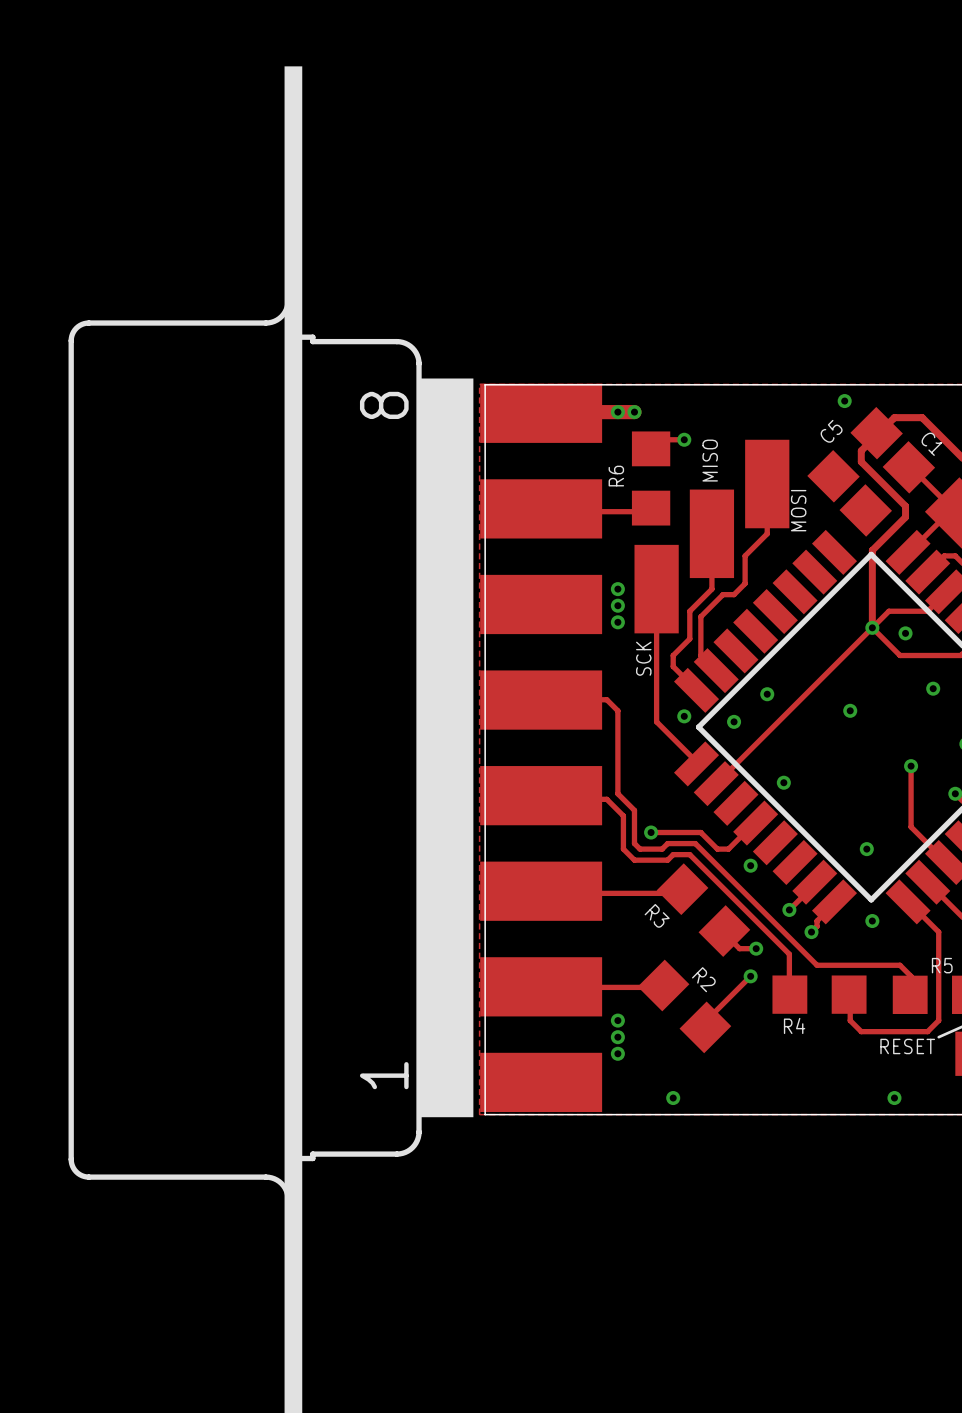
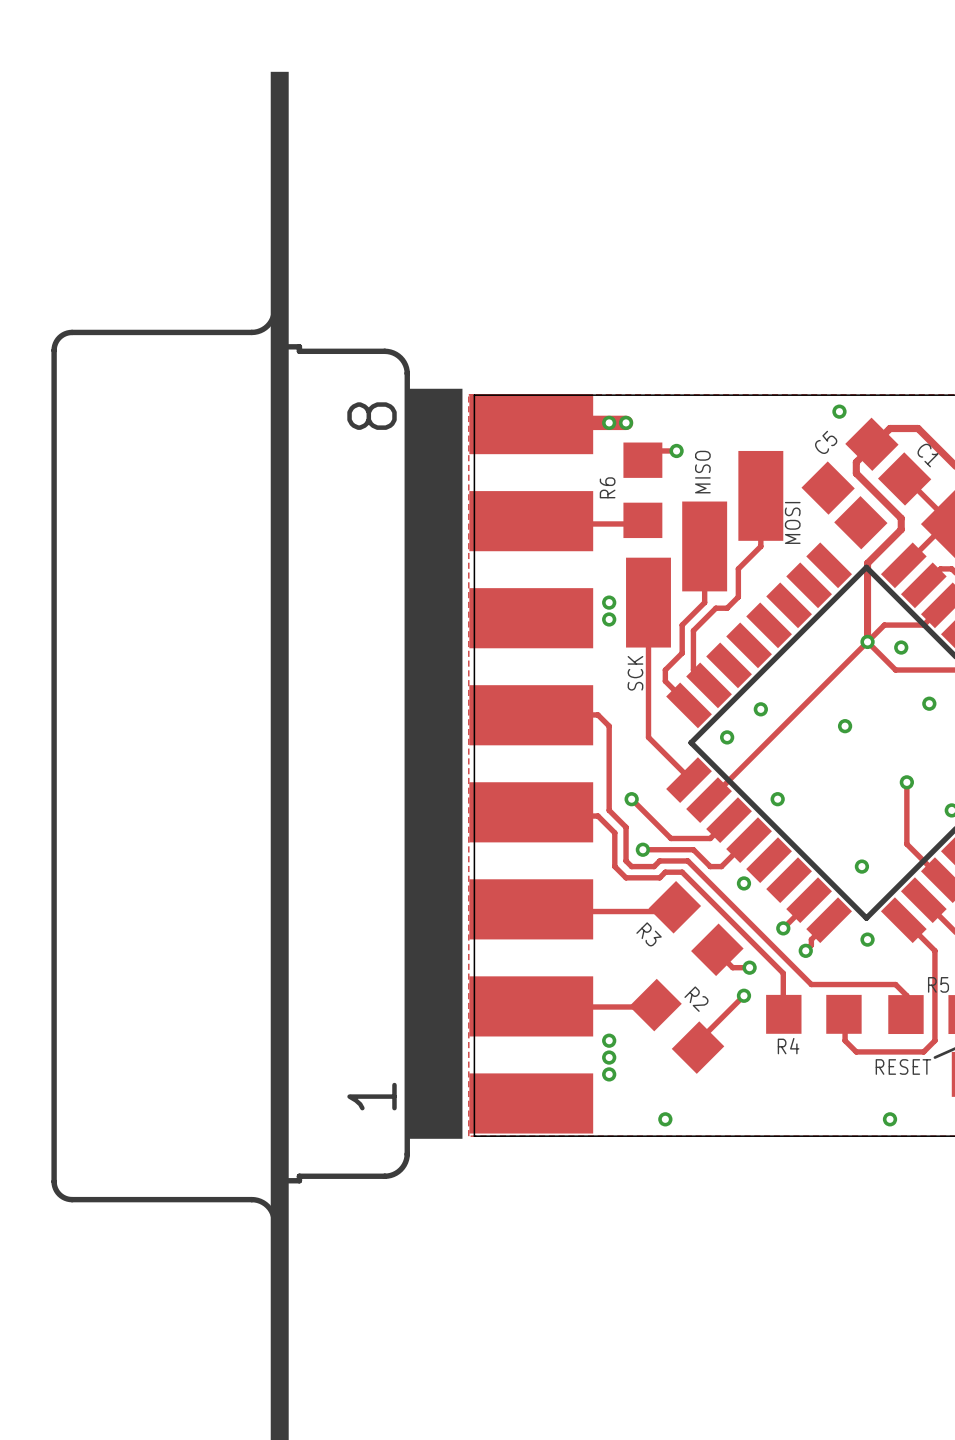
via: (617, 622) -> none
via position: (684, 716) -> (631, 799)
track: none -> (631, 799) (670, 838) (710, 838) (727, 821)

